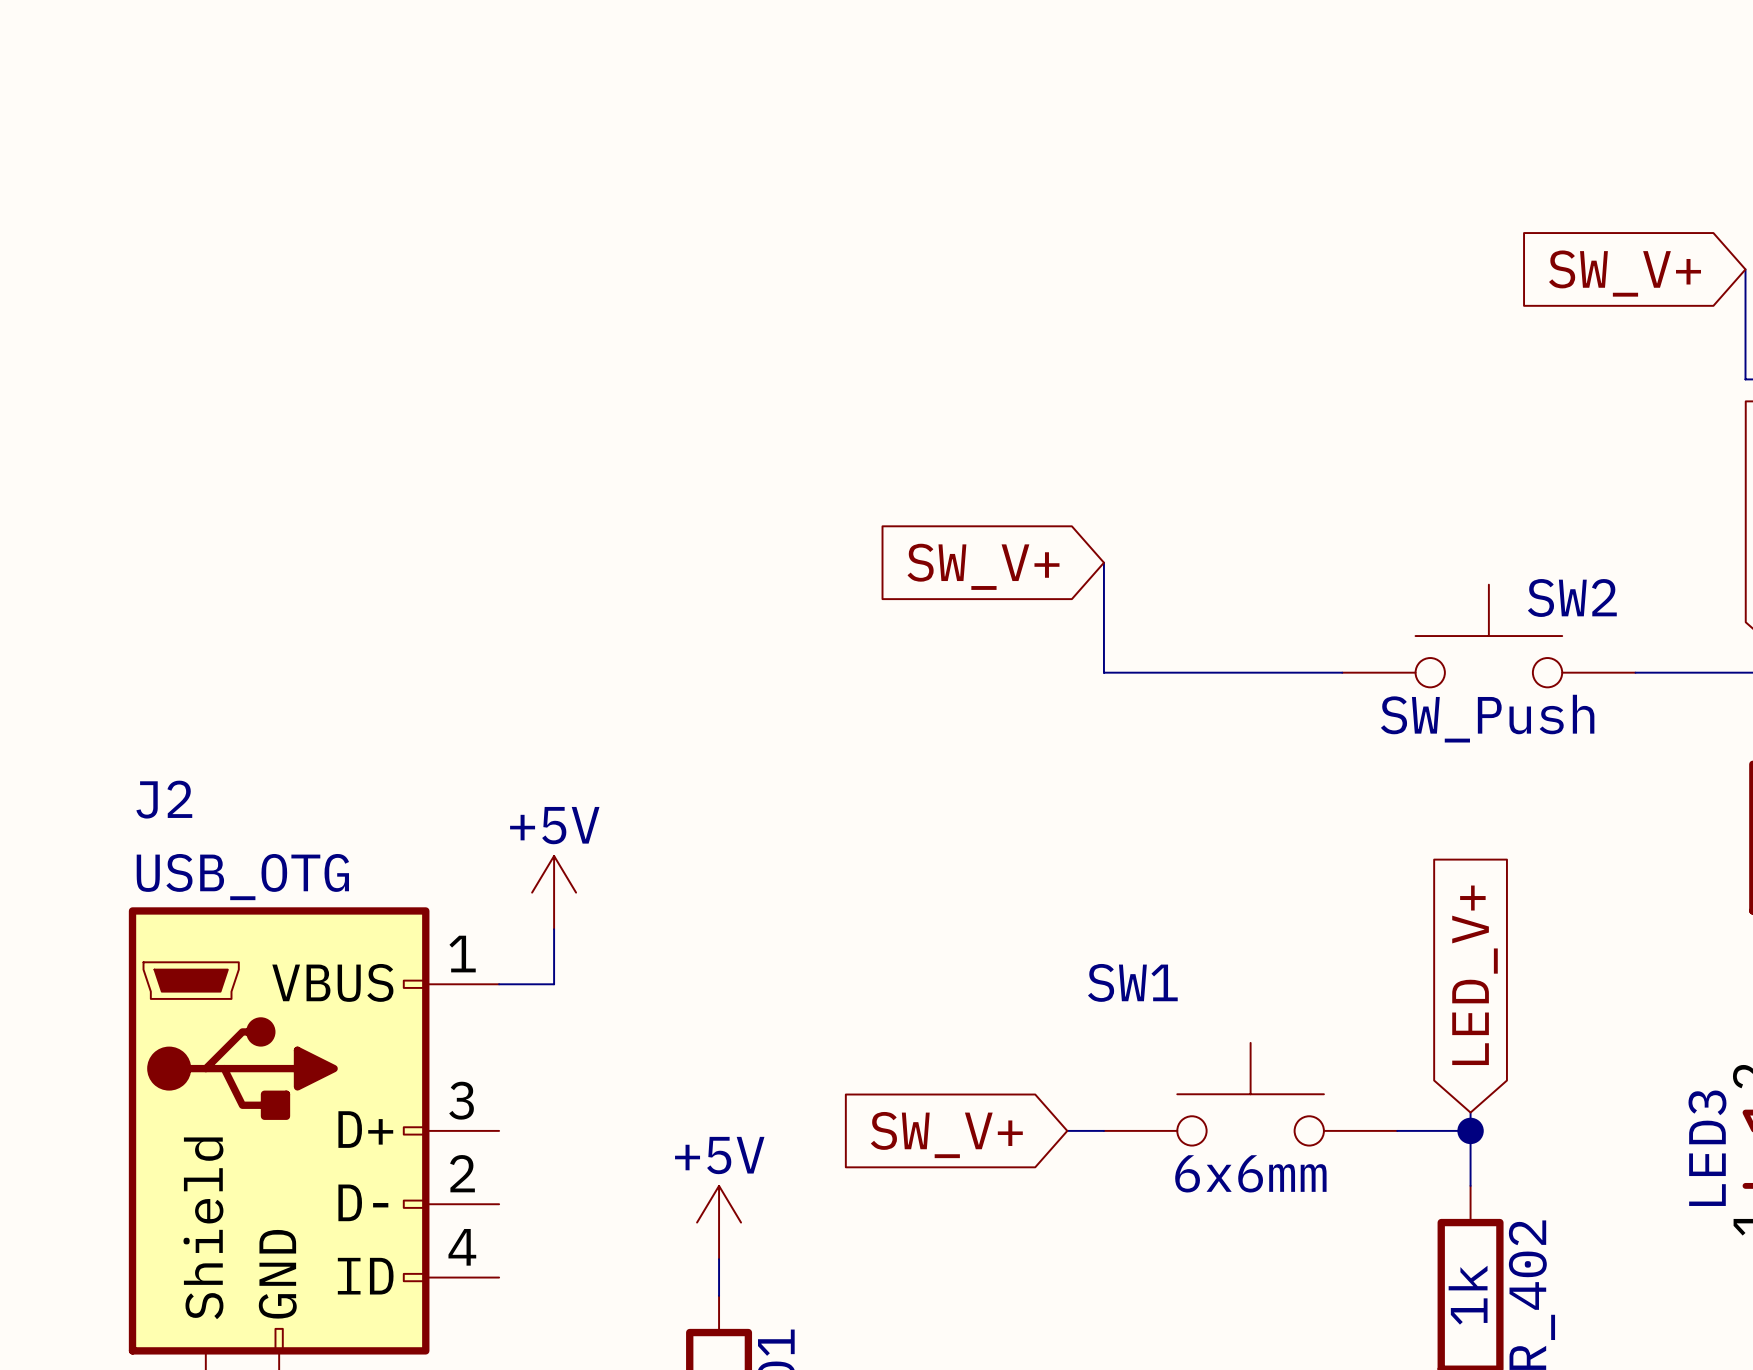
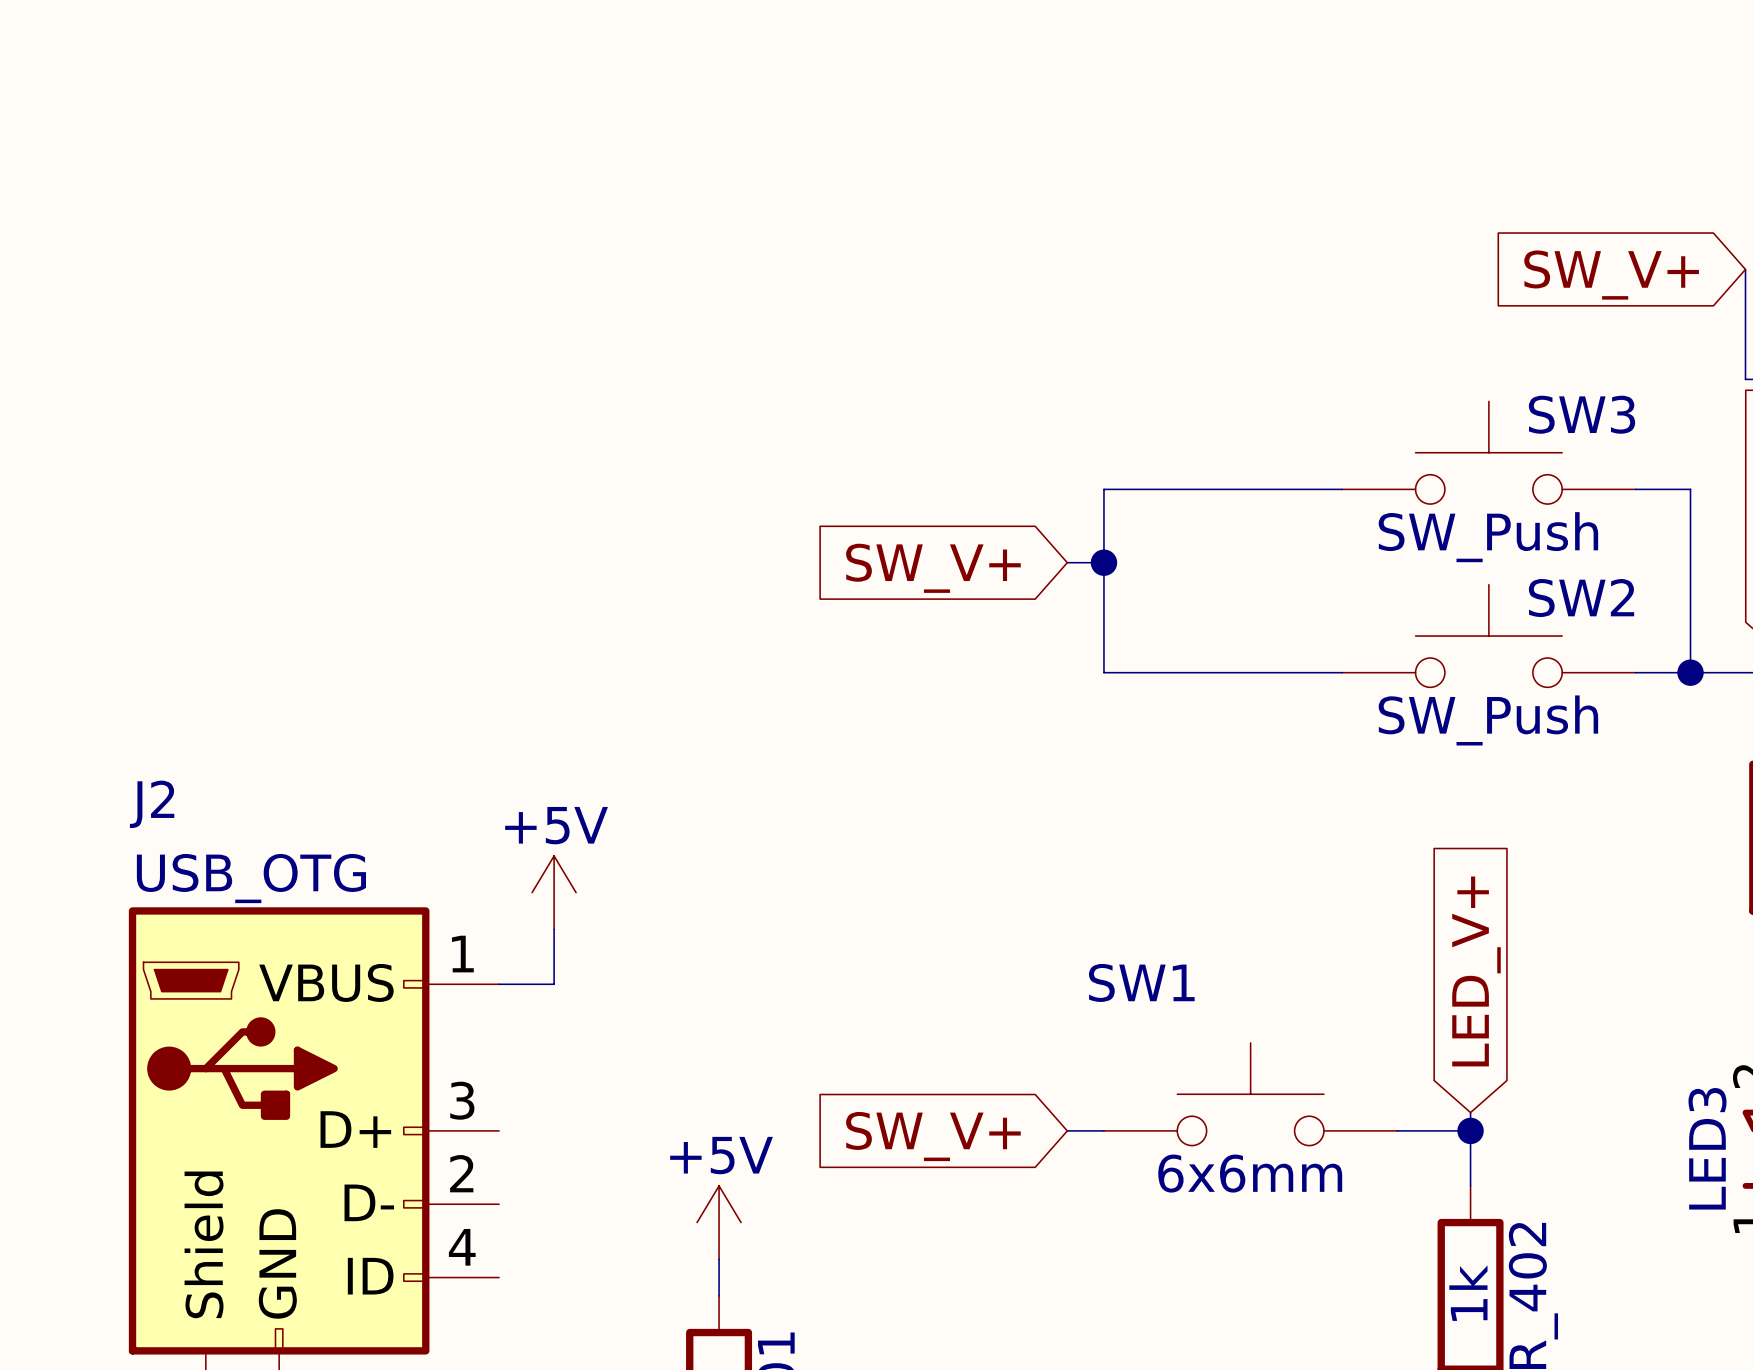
SW3: none -> SW_Push (1488, 452)
wire: none -> (1342, 489) (1103, 489) (1103, 562) (1067, 562)
wire: none -> (1635, 489) (1690, 489) (1690, 672)
junction: none -> (1103, 562)
global label position: SW_V+ (983, 566) -> SW_V+ (933, 568)
junction: none -> (1690, 672)

